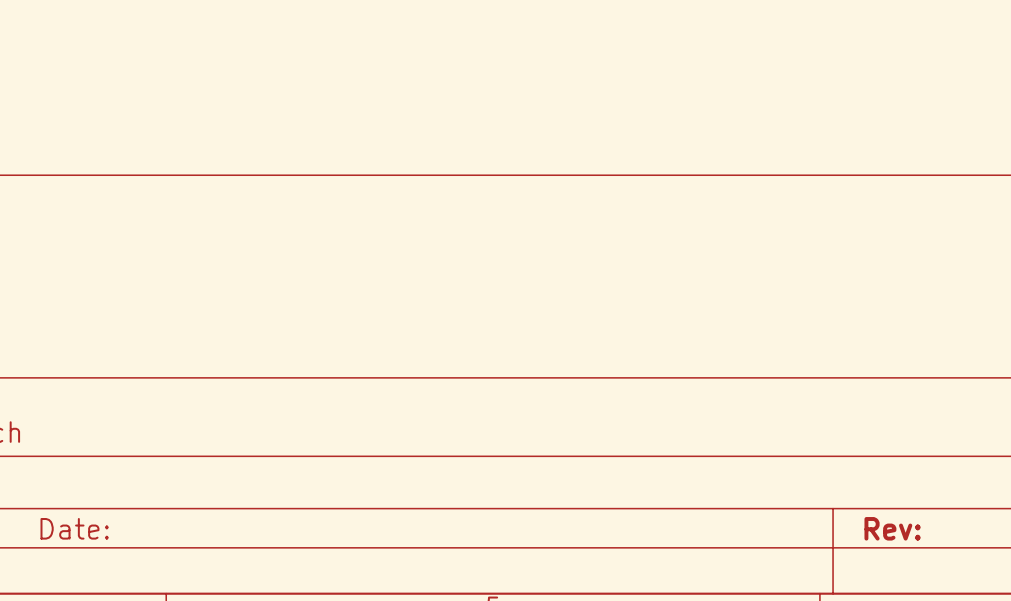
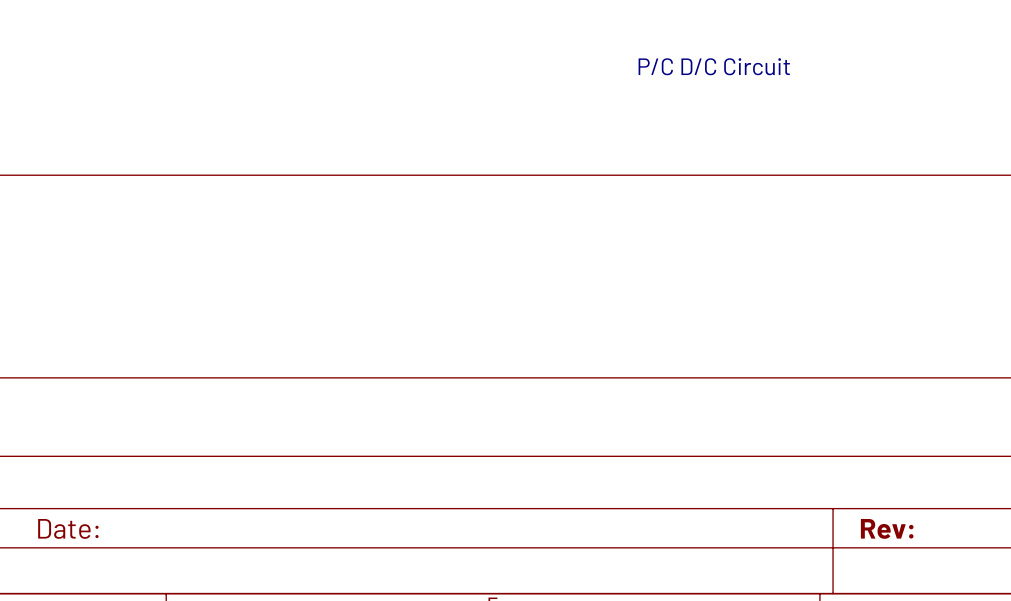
text: none -> P/C D/C Circuit (714, 66)

